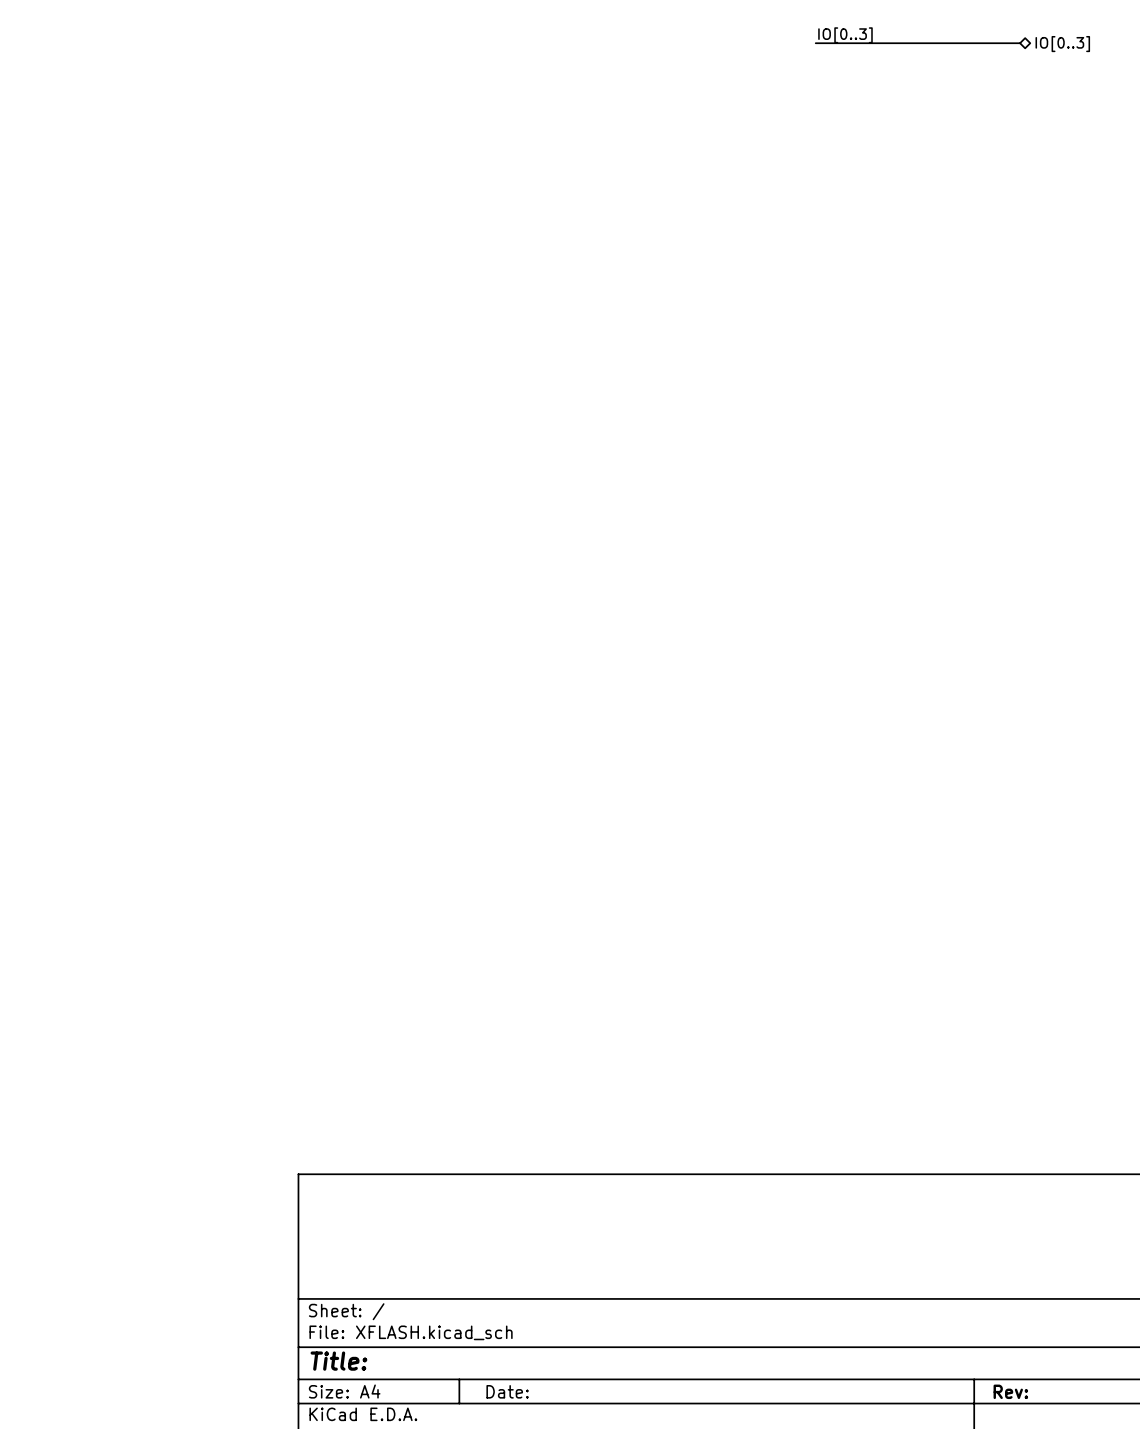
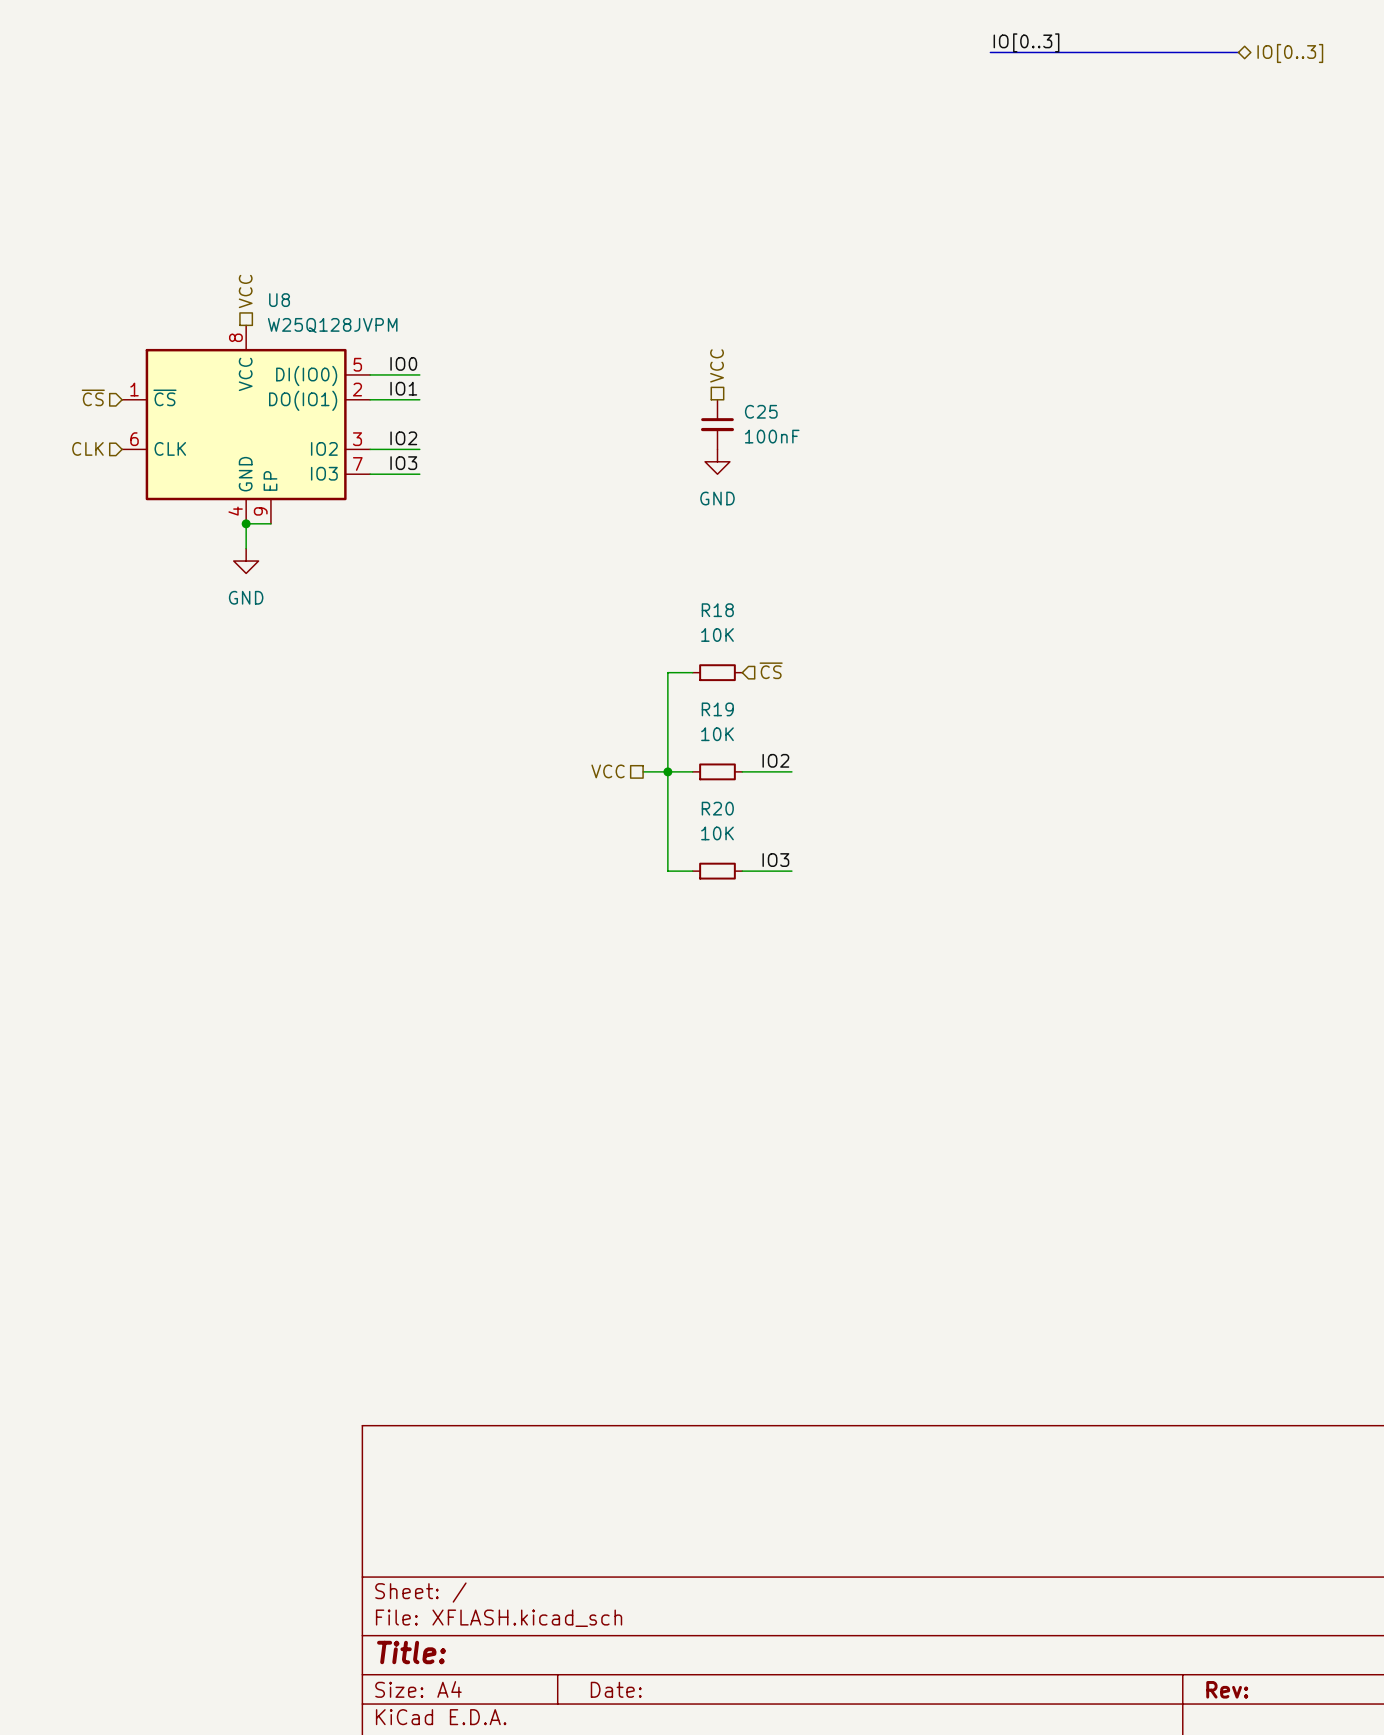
hierarchical label: none -> VCC (245, 291)
label: none -> IO0 (403, 363)
hierarchical label: none -> VCC (717, 365)
wire: none -> (370, 374) (419, 374)
label: none -> IO1 (403, 388)
hierarchical label: none -> ~{CS} (93, 397)
wire: none -> (370, 399) (419, 399)
U8: none -> W25Q128JVPM (246, 424)
C25: none -> 100nF (717, 424)
label: none -> IO2 (403, 438)
hierarchical label: none -> CLK (87, 448)
wire: none -> (370, 449) (419, 449)
power symbol: none -> GND (717, 461)
label: none -> IO3 (403, 463)
wire: none -> (370, 474) (419, 474)
junction: none -> (246, 523)
wire: none -> (270, 523) (246, 523) (246, 548)
power symbol: none -> GND (246, 561)
hierarchical label: none -> ~{CS} (771, 670)
wire: none -> (692, 672) (667, 672) (667, 871) (692, 871)
R18: none -> 10K (717, 672)
label: none -> IO2 (775, 760)
hierarchical label: none -> VCC (608, 771)
wire: none -> (643, 771) (692, 771)
junction: none -> (667, 771)
R19: none -> 10K (717, 771)
wire: none -> (742, 771) (791, 771)
label: none -> IO3 (775, 860)
R20: none -> 10K (717, 871)
wire: none -> (742, 871) (791, 871)

